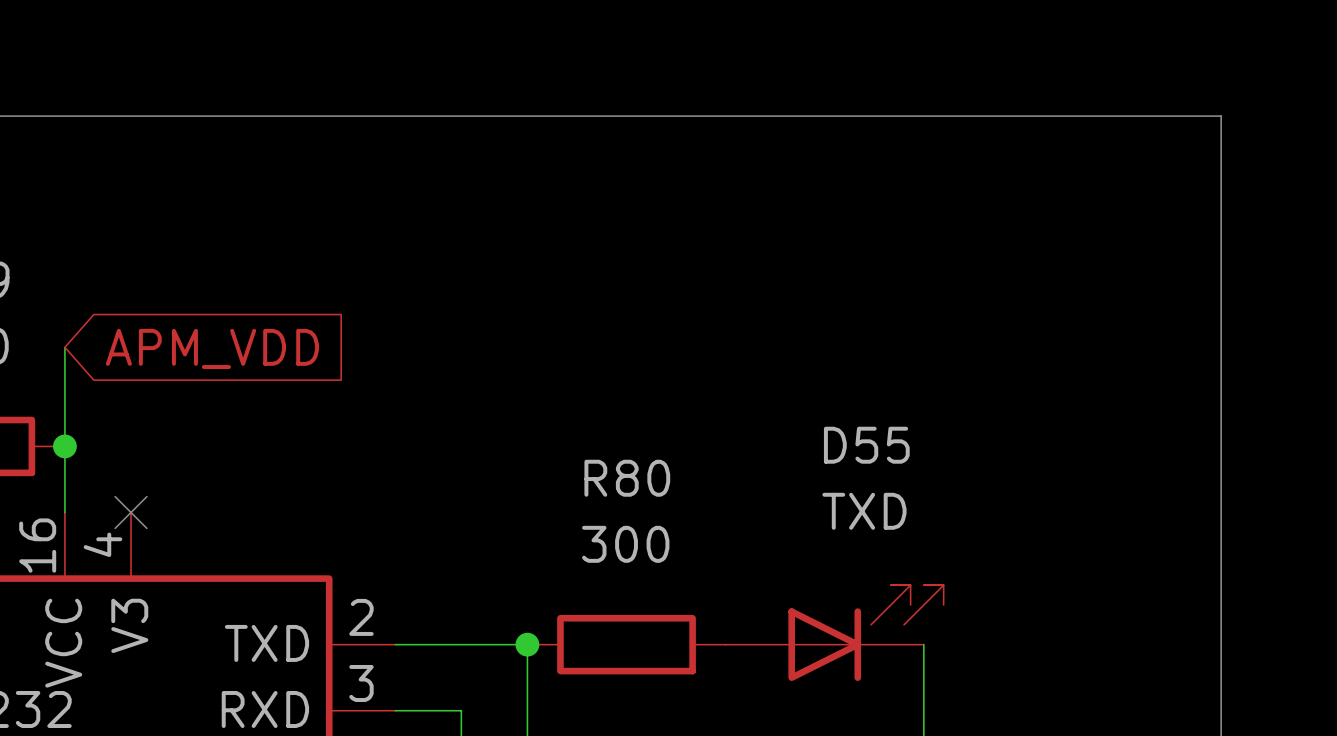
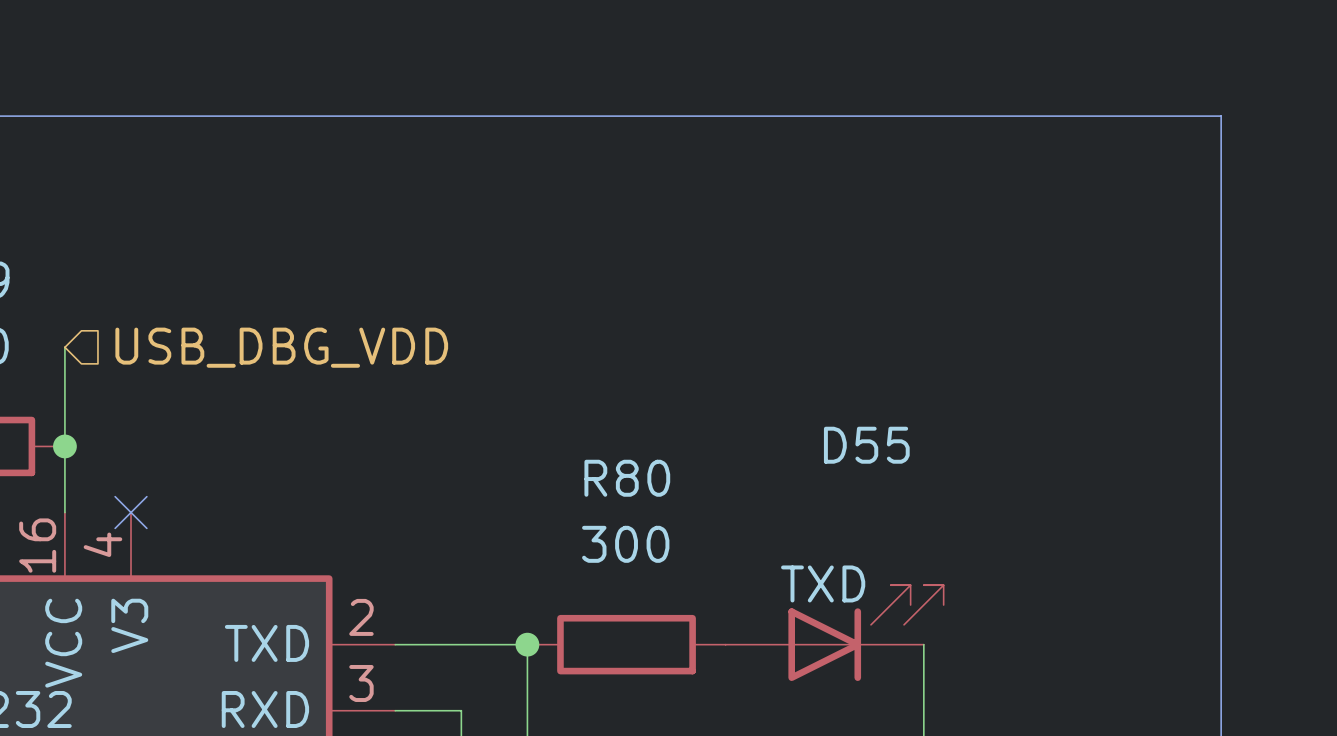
hierarchical label: none -> USB_DBG_VDD (281, 347)
global label: APM_VDD (212, 348) -> none
D55 value position: TXD (864, 511) -> TXD (823, 583)

